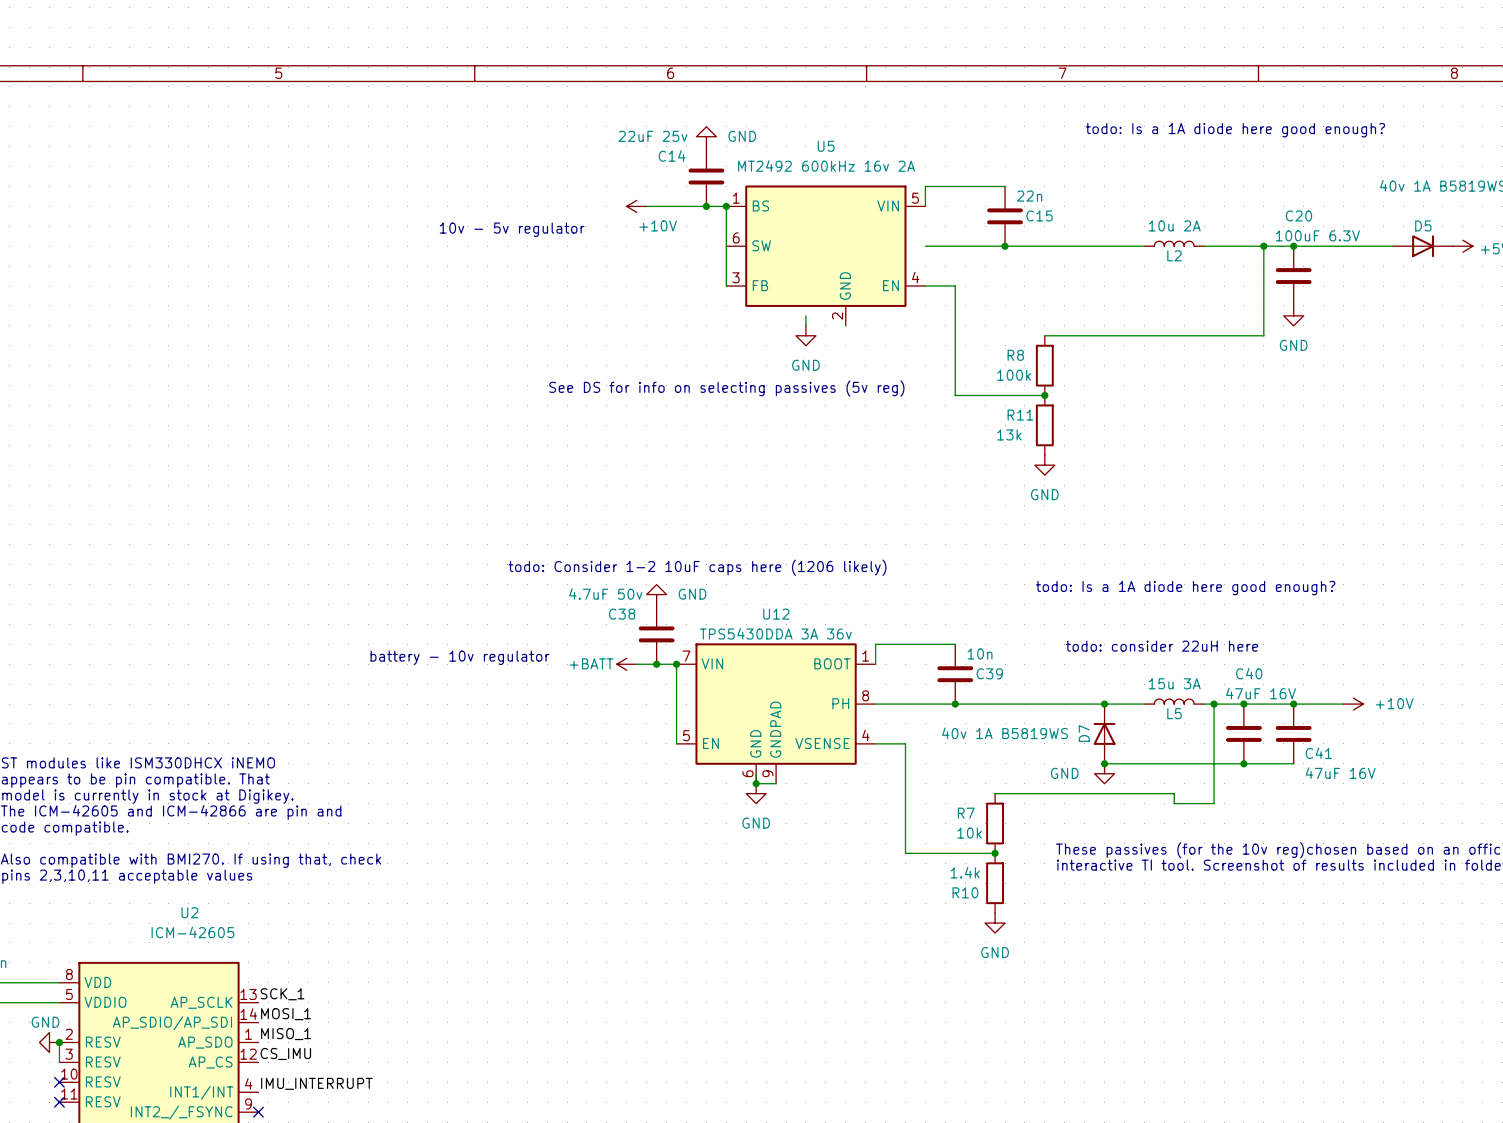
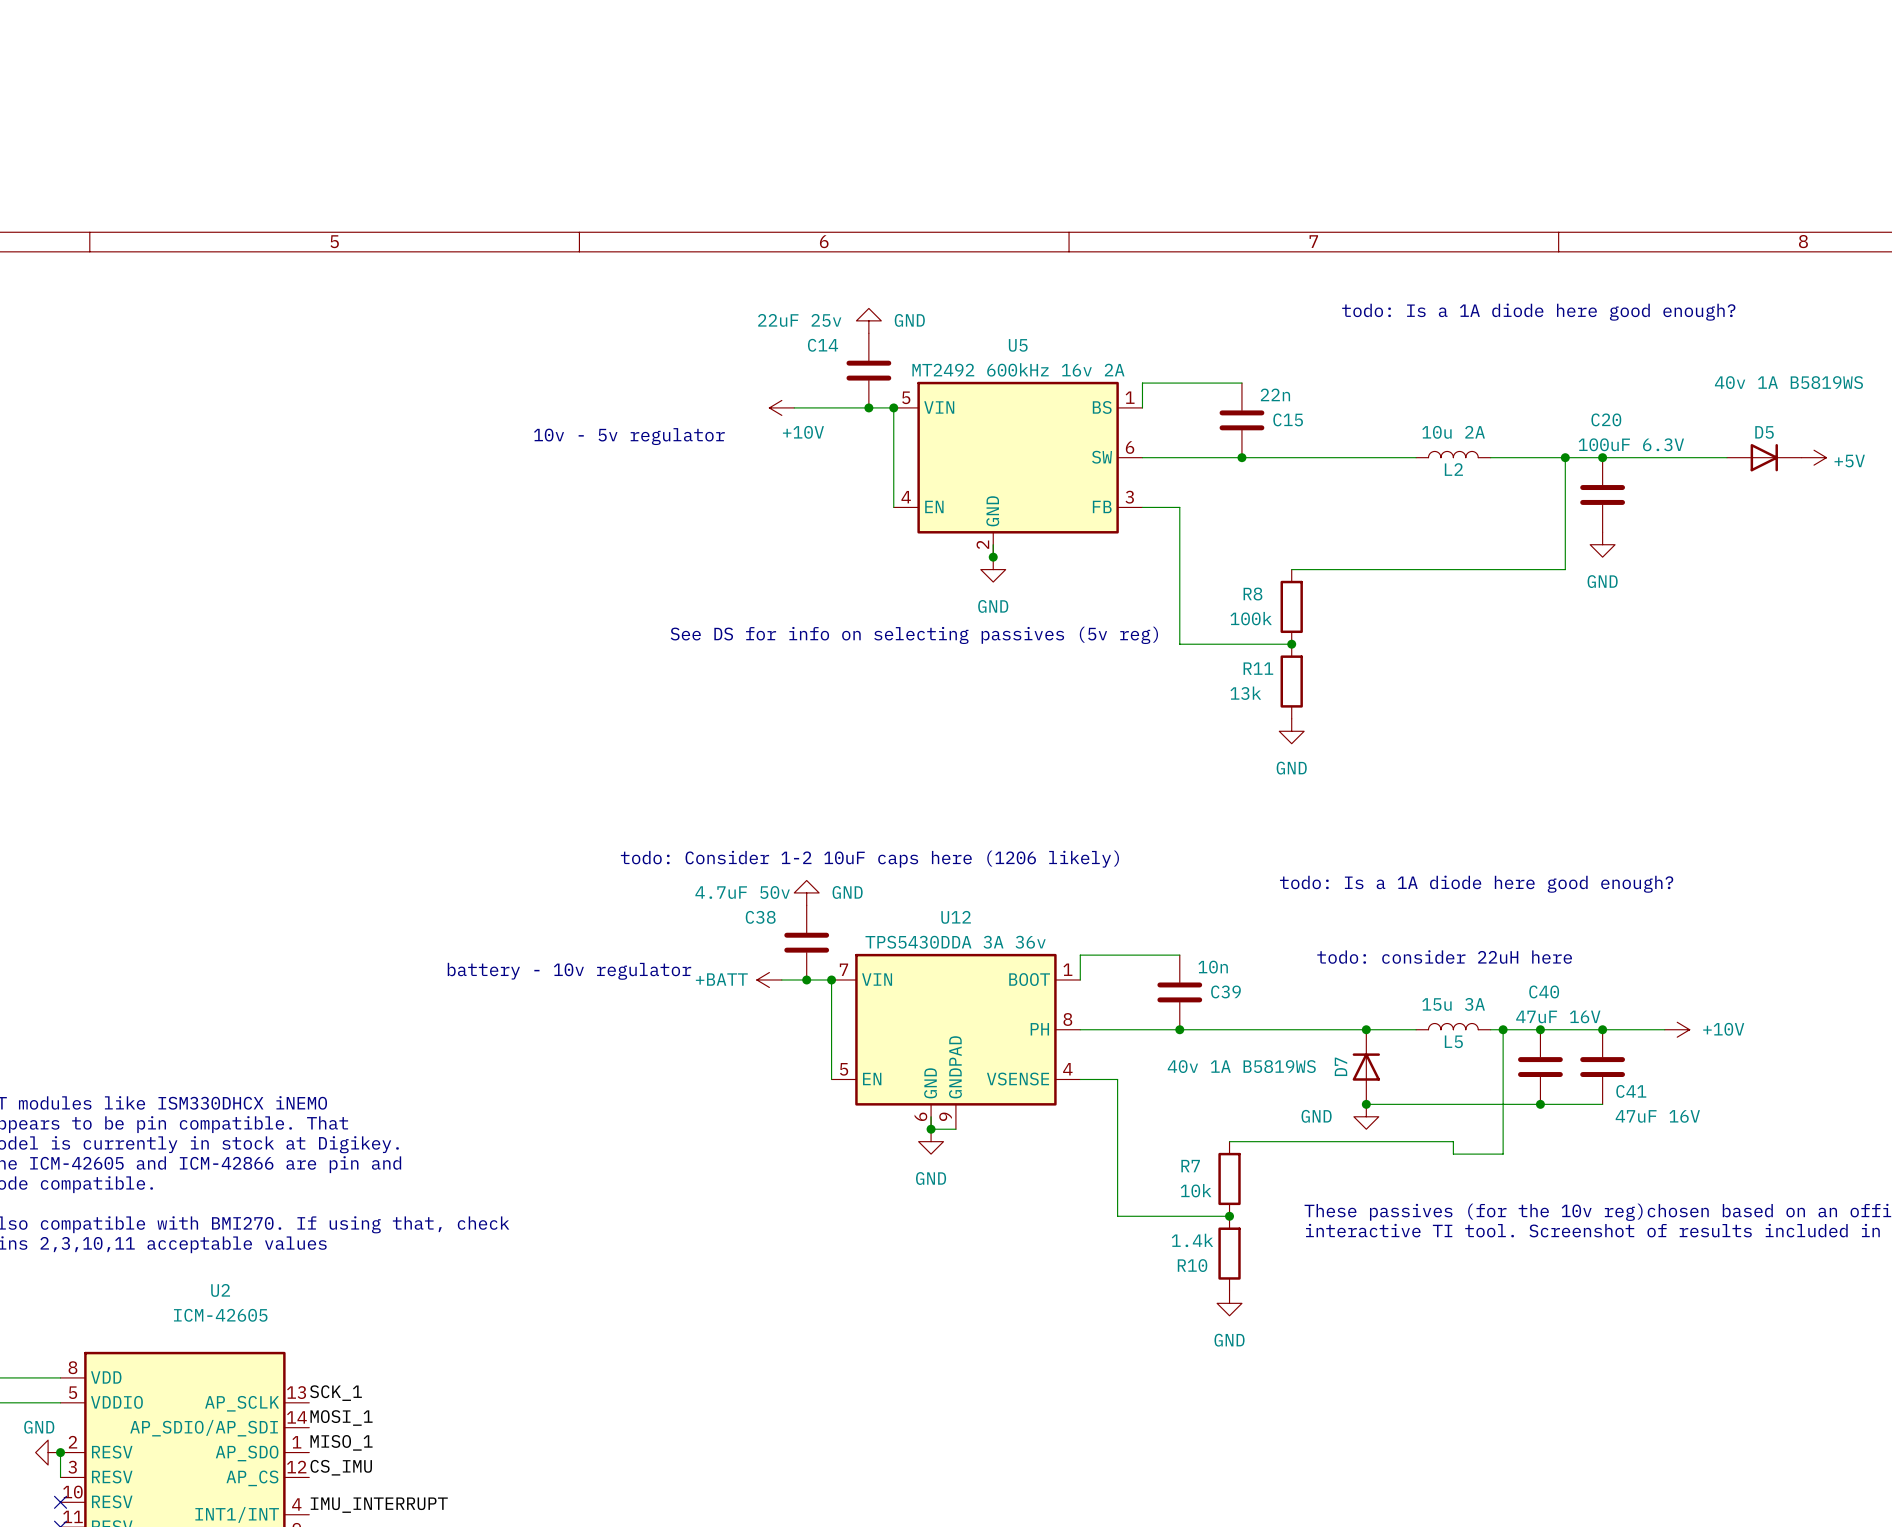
U5 flip: as is (825, 246) -> left-right (1018, 457)
junction: none -> (993, 557)

